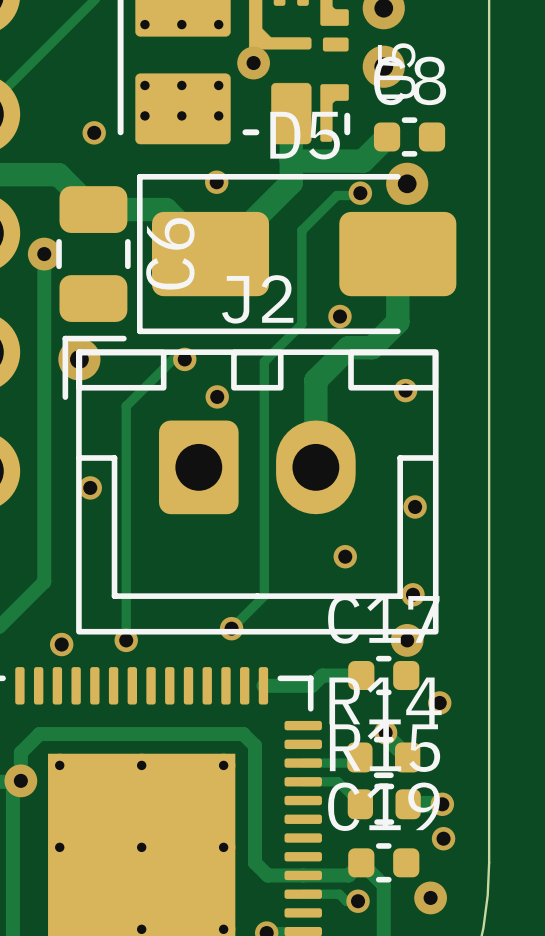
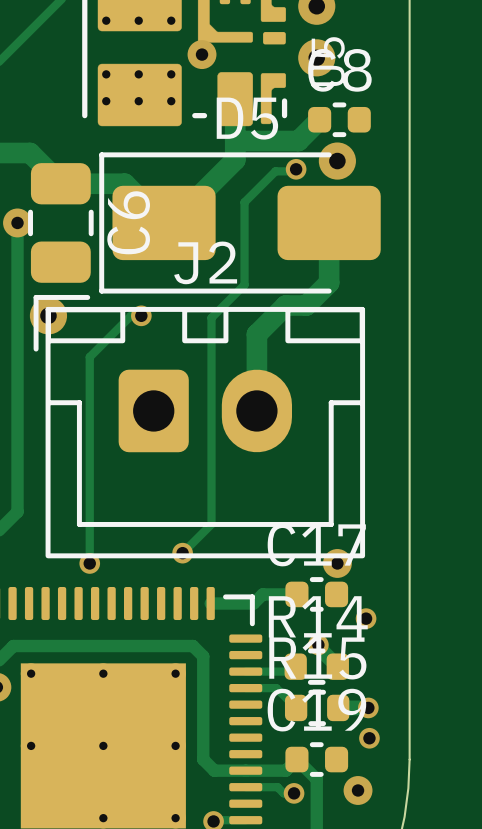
via: (94, 132) -> none
via: (216, 182) -> none
via: (339, 316) -> none
via: (405, 390) -> none
via: (217, 396) -> none
via: (90, 487) -> none
via: (415, 506) -> none
via: (345, 556) -> none
via: (412, 594) -> none
via: (61, 644) -> none

